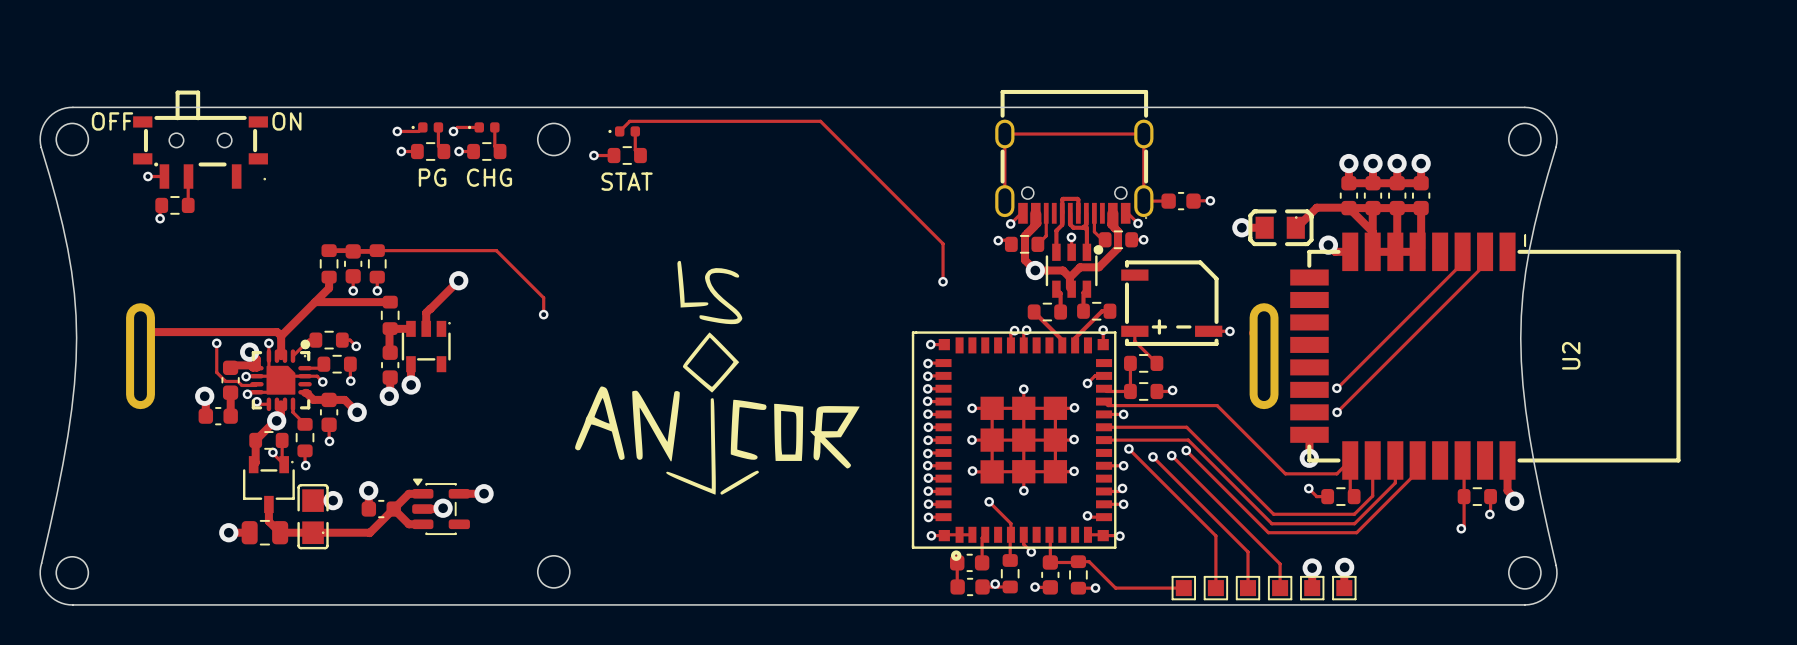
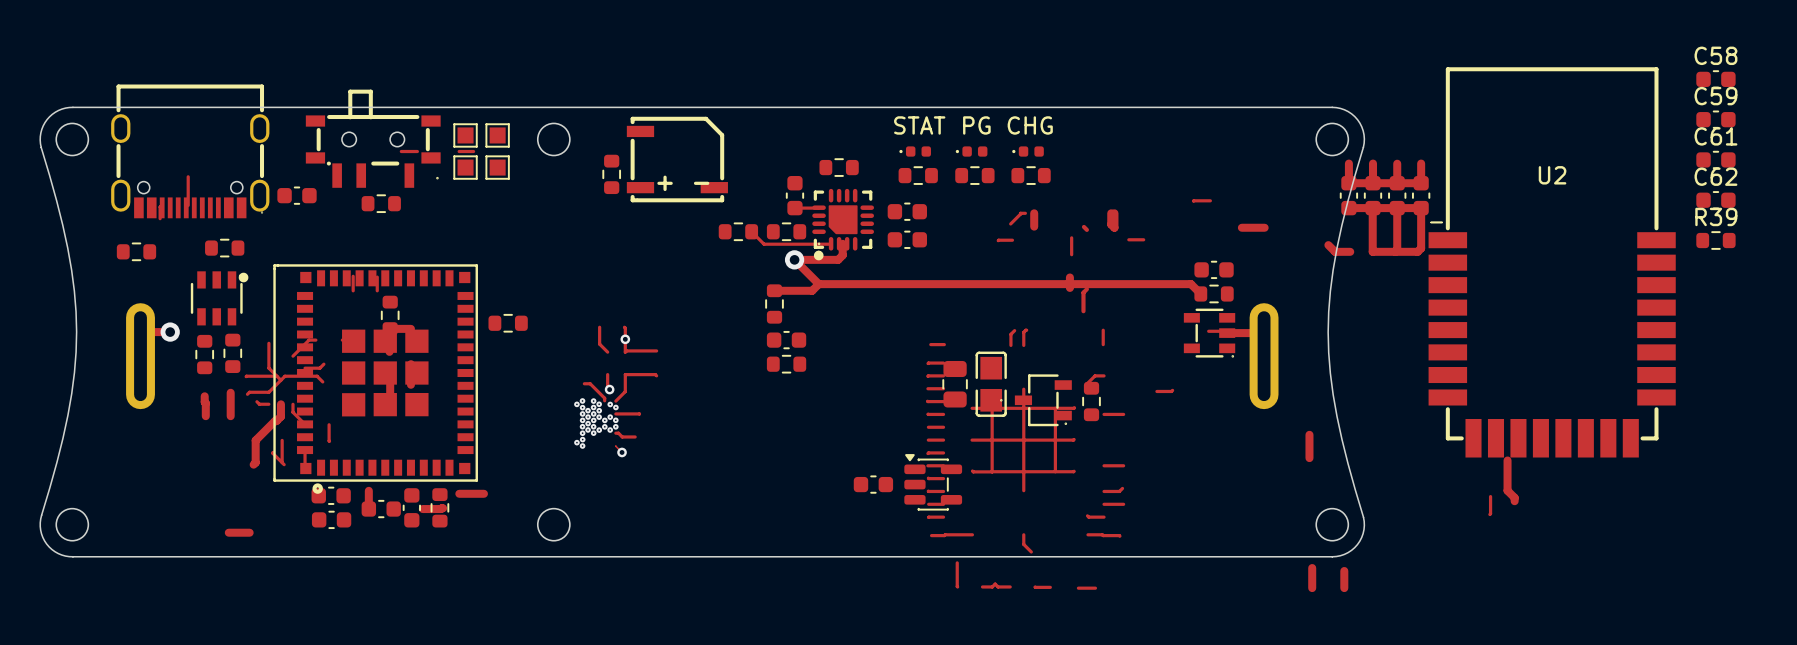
C58: none -> (1715, 79)
part footprint: [133, 90, 268, 189] -> [111, 84, 270, 219]
board edge: (1332, 107) (1529, 107) (1544, 113) (1554, 126) (1556, 143) (1529, 249) (1521, 316) (1521, 361) (1525, 410) (1534, 465) (1556, 569) (1555, 581) (1552, 589) (1547, 595) (1536, 602) (1524, 604) (72, 604) (61, 603) (51, 597) (44, 588) (40, 570) (62, 464) (71, 409) (76, 360) (76, 315) (67, 248) (41, 147) -> (1332, 107) (1344, 109) (1354, 116) (1361, 126) (1364, 139) (1336, 248) (1330, 291) (1328, 332) (1330, 373) (1337, 416) (1364, 525) (1361, 537) (1354, 547) (1344, 554) (1332, 556) (72, 556) (61, 555) (46, 544) (41, 533) (40, 522) (62, 438) (71, 393) (76, 352) (76, 311) (67, 248) (41, 147)
C59: none -> (1715, 119)
text: OFF (112, 121) -> none
text: ON (286, 121) -> none
text: none -> PG (976, 125)
text: none -> CHG (1030, 125)
track: (422, 127) (418, 131) (397, 131) -> none
part: (427, 127) -> none
track: (438, 127) (438, 146) (443, 151) -> none
track: (479, 127) (457, 127) (453, 131) -> none
part: (483, 127) -> none
track: (494, 127) (494, 146) (500, 151) -> none
via: (397, 131) -> none
via: (453, 131) -> none
track: (619, 131) (629, 121) (820, 121) (943, 243) (943, 281) -> none
part: (624, 131) -> none
track: (635, 131) (635, 150) (640, 155) -> none
part: none -> (465, 135)
part: none -> (497, 135)
part: none -> (373, 138)
round board edge position: (1524, 139) -> (1332, 139)
via: (401, 151) -> none
part: (430, 151) -> none
via: (459, 151) -> none
part: (486, 151) -> none
part: none -> (915, 151)
part: none -> (971, 151)
part: none -> (1028, 151)
track: (593, 155) (614, 155) -> none
via: (593, 155) -> none
part rotation: 0° (627, 155) -> 90° clockwise (611, 174)
part position: (627, 155) -> (611, 174)
part: (1074, 156) -> none
part: none -> (677, 159)
C61: none -> (1715, 159)
via: (1348, 163) -> none
via: (1373, 163) -> none
via: (1397, 163) -> none
via: (1421, 163) -> none
part: none -> (465, 167)
part: none -> (497, 167)
part: none -> (839, 167)
part: none -> (918, 175)
part: none -> (974, 175)
part: none -> (1031, 175)
track: (147, 176) (164, 176) -> none
via: (147, 176) -> none
text: PG (432, 177) -> none
text: CHG (489, 177) -> none
text position: STAT (627, 181) -> STAT (919, 125)
part: none -> (794, 195)
via: (1210, 200) -> none
C62: none -> (1715, 200)
track: (1004, 201) (1004, 134) (1143, 134) (1143, 201) (1168, 201) -> none
part position: (1181, 201) -> (1214, 269)
part: none -> (381, 203)
part: (174, 205) -> none
track: none -> (819, 207) (794, 208)
part: none -> (907, 211)
track: (1046, 213) (1046, 235) (1037, 244) -> none
track: (1070, 213) (1070, 224) (1073, 227) (1083, 227) (1086, 224) (1086, 213) -> none
track: (1078, 213) (1077, 198) (1062, 199) (1062, 224) (1056, 230) (1056, 254) -> none
track: (1094, 213) (1094, 231) (1102, 239) (1105, 239) -> none
track: (1128, 213) (1138, 223) -> none
track: (1037, 214) (1037, 223) (1024, 235) (1024, 260) (1035, 270) (1062, 270) (1069, 277) (1080, 267) (1098, 267) (1117, 248) (1117, 231) (1115, 228) -> none
via: (160, 218) -> none
via: (1010, 223) -> none
via: (1138, 223) -> none
part: none -> (843, 224)
track: (1086, 227) (1086, 254) -> none
via: (1241, 227) -> none
part: (1280, 227) -> none
track: (1295, 227) (1316, 207) (1348, 207) (1372, 231) (1372, 251) -> none
part: none -> (738, 231)
part: none -> (786, 231)
track: none -> (750, 232) (752, 232) (764, 244) (831, 243)
via: (1071, 237) -> none
part: none -> (907, 239)
part: (1118, 239) -> none
via: (1143, 239) -> none
via: (998, 240) -> none
R39: none -> (1715, 240)
track: none -> (842, 243) (842, 255) (838, 259) (794, 259) (818, 284)
part: (1024, 244) -> none
via: (1328, 245) -> none
part: none -> (224, 248)
track: (329, 250) (496, 250) (543, 297) (543, 314) -> none
part: none -> (136, 251)
track: (1462, 251) (1462, 263) (1336, 388) -> none
track: (1485, 251) (1485, 264) (1337, 412) -> none
via: none -> (794, 259)
drawing: [575, 260, 860, 495] -> none
part: (329, 263) -> none
part rotation: 0° (353, 263) -> 90° clockwise (297, 195)
part position: (353, 263) -> (297, 195)
part: (377, 263) -> none
via: (1035, 270) -> none
part: (1074, 270) -> none
track: (329, 277) (329, 288) (281, 336) (277, 332) (170, 332) -> none
track: (458, 280) (426, 312) (426, 328) -> none
via: (458, 280) -> none
via: (943, 281) -> none
track: none -> (818, 284) (812, 290) (774, 290)
track: none -> (818, 284) (1190, 284) (1200, 293)
track: (1056, 289) (1060, 293) (1060, 312) -> none
via: (353, 290) -> none
via: (377, 290) -> none
part: none -> (1214, 293)
part: none -> (219, 298)
track: (315, 302) (390, 302) -> none
part: none -> (774, 303)
part: (1171, 303) -> none
part: (1096, 311) -> none
track: (1109, 311) (1102, 311) (1075, 338) (1075, 345) -> none
track: (1034, 312) (1062, 340) (1062, 345) -> none
part: (1047, 312) -> none
via: (543, 314) -> none
part: none -> (508, 323)
track: none -> (599, 327) (599, 344) (607, 352)
track: none -> (624, 327) (625, 352) (656, 350)
via: (1014, 330) -> none
via: (1026, 330) -> none
via: (1103, 330) -> none
track: (1134, 331) (1134, 341) (1156, 363) -> none
via: (1229, 331) -> none
via: none -> (170, 332)
part: none -> (1209, 333)
track: none -> (1227, 333) (1253, 333)
track: (281, 335) (281, 356) -> none
via: none -> (625, 339)
part: (329, 340) -> none
part: none -> (786, 340)
track: (216, 343) (216, 372) (225, 381) (237, 381) (241, 385) (256, 384) -> none
via: (216, 343) -> none
via: (268, 343) -> none
via: (930, 344) -> none
via: (356, 346) -> none
part: (426, 346) -> none
track: (249, 352) (256, 359) (256, 367) (250, 365) (233, 365) (230, 368) -> none
via: (249, 352) -> none
part: none -> (232, 353)
part: none -> (204, 354)
U2 rotation: 0° (1485, 356) -> 90° counterclockwise (1552, 262)
via: (928, 363) -> none
track: (1130, 363) (1130, 391) (1106, 391) (1104, 388) -> none
part: (1143, 363) -> none
part: (337, 364) -> none
part: none -> (786, 364)
part: (390, 365) -> none
track: none -> (607, 374) (607, 387) (609, 389)
part: (280, 375) -> none
track: none -> (656, 375) (625, 374) (625, 391) (615, 401)
via: (246, 376) -> none
via: (927, 376) -> none
part: none -> (375, 379)
part: (230, 380) -> none
via: (322, 381) -> none
via: (350, 381) -> none
track: none -> (584, 383) (590, 383) (604, 398) (604, 400)
via: (1087, 383) -> none
part: none -> (955, 384)
part: none -> (991, 384)
via: (411, 385) -> none
via: (927, 388) -> none
via: (1336, 388) -> none
via: none -> (609, 389)
via: (1023, 389) -> none
via: (1172, 390) -> none
part: (1143, 391) -> none
track: (305, 392) (313, 399) (344, 399) (357, 412) -> none
via: (247, 394) -> none
via: (204, 396) -> none
via: (389, 396) -> none
via: none -> (582, 400)
part: none -> (1043, 400)
via: (256, 401) -> none
via: none -> (593, 401)
via: (927, 401) -> none
part: none -> (1091, 401)
track: (1104, 401) (1108, 405) (1217, 405) (1285, 473) (1336, 473) (1350, 460) (1350, 492) (1354, 496) -> none
via: none -> (576, 404)
via: none -> (599, 404)
via: none -> (610, 404)
via: none -> (582, 407)
via: none -> (593, 407)
via: none -> (615, 407)
via: (1074, 407) -> none
via: (972, 408) -> none
via: none -> (588, 410)
via: none -> (599, 410)
part: (329, 412) -> none
via: (357, 412) -> none
via: (1337, 412) -> none
via: none -> (582, 413)
via: none -> (593, 413)
track: none -> (615, 413) (639, 413)
via: (928, 414) -> none
via: (1123, 414) -> none
part: (218, 416) -> none
via: none -> (588, 417)
via: none -> (599, 417)
via: none -> (610, 417)
via: (276, 420) -> none
via: none -> (582, 420)
via: none -> (593, 420)
via: none -> (604, 420)
via: none -> (615, 420)
via: none -> (588, 423)
via: none -> (582, 426)
via: none -> (593, 426)
via: none -> (604, 426)
via: none -> (615, 426)
via: (928, 427) -> none
track: (1104, 427) (1186, 427) (1273, 514) (1354, 514) (1372, 495) (1372, 460) -> none
via: none -> (588, 429)
via: none -> (599, 430)
via: none -> (610, 430)
via: none -> (582, 433)
via: none -> (593, 433)
track: none -> (615, 433) (622, 436) (635, 436)
part: (305, 437) -> none
via: none -> (582, 439)
via: (1074, 439) -> none
part: (268, 440) -> none
via: (928, 440) -> none
via: (971, 440) -> none
track: (1104, 440) (1188, 440) (1271, 523) (1354, 523) (1395, 482) (1395, 460) -> none
via: (329, 441) -> none
via: none -> (576, 442)
via: none -> (582, 445)
track: none -> (615, 446) (622, 452)
part: (1014, 446) -> none
track: (1128, 448) (1215, 535) (1215, 588) -> none
via: (1128, 448) -> none
track: (1186, 450) (1268, 532) (1356, 532) (1417, 471) -> none
via: (1186, 450) -> none
via: (272, 452) -> none
via: none -> (622, 452)
via: (927, 453) -> none
track: (1171, 455) (1280, 564) (1280, 588) -> none
via: (1171, 455) -> none
track: (1152, 456) (1248, 551) (1248, 588) -> none
via: (1152, 456) -> none
via: (1309, 458) -> none
track: (1462, 460) (1464, 525) (1461, 528) -> none
via: (305, 465) -> none
via: (927, 465) -> none
via: (1123, 465) -> none
via: (972, 471) -> none
via: (1074, 471) -> none
part footprint: [412, 478, 470, 536] -> [430, 488, 450, 528]
via: (928, 478) -> none
part: none -> (933, 482)
part: (268, 484) -> none
part: none -> (873, 484)
via: (1122, 488) -> none
track: (1308, 488) (1316, 496) (1327, 496) -> none
via: (1308, 488) -> none
via: (368, 490) -> none
via: (1023, 490) -> none
via: (928, 491) -> none
track: (422, 493) (408, 493) (369, 533) (280, 532) (268, 521) (268, 504) -> none
via: (484, 493) -> none
part: none -> (331, 495)
part: (1340, 496) -> none
part: (1477, 496) -> none
via: (333, 500) -> none
track: (989, 501) (1010, 523) (1010, 560) -> none
via: (989, 501) -> none
via: (1514, 501) -> none
via: (928, 504) -> none
via: (1123, 504) -> none
part: none -> (411, 507)
via: (443, 508) -> none
track: (393, 509) (408, 524) (422, 524) -> none
via: (1489, 514) -> none
via: (1087, 515) -> none
part: (313, 516) -> none
via: (928, 517) -> none
part: none -> (331, 519)
via: (1461, 528) -> none
via: (228, 532) -> none
part: (264, 532) -> none
track: (985, 534) (982, 537) (982, 562) -> none
track: (1049, 534) (1050, 562) (1089, 561) (1115, 588) (1183, 588) -> none
via: (931, 535) -> none
via: (1119, 536) -> none
via: (1031, 551) -> none
part: (969, 562) -> none
via: (1344, 567) -> none
via: (1312, 568) -> none
round board edge position: (553, 571) -> (553, 524)
round board edge position: (72, 572) -> (72, 524)
round board edge position: (1524, 572) -> (1332, 524)
part: (1010, 573) -> none
part: (1050, 574) -> none
part: (1078, 574) -> none
via: (995, 584) -> none
part: (970, 586) -> none
via: (1035, 587) -> none
via: (1095, 588) -> none
part: (1183, 588) -> none
part: (1215, 588) -> none
part: (1248, 588) -> none
part: (1280, 588) -> none
part: (1312, 588) -> none
part: (1344, 588) -> none

